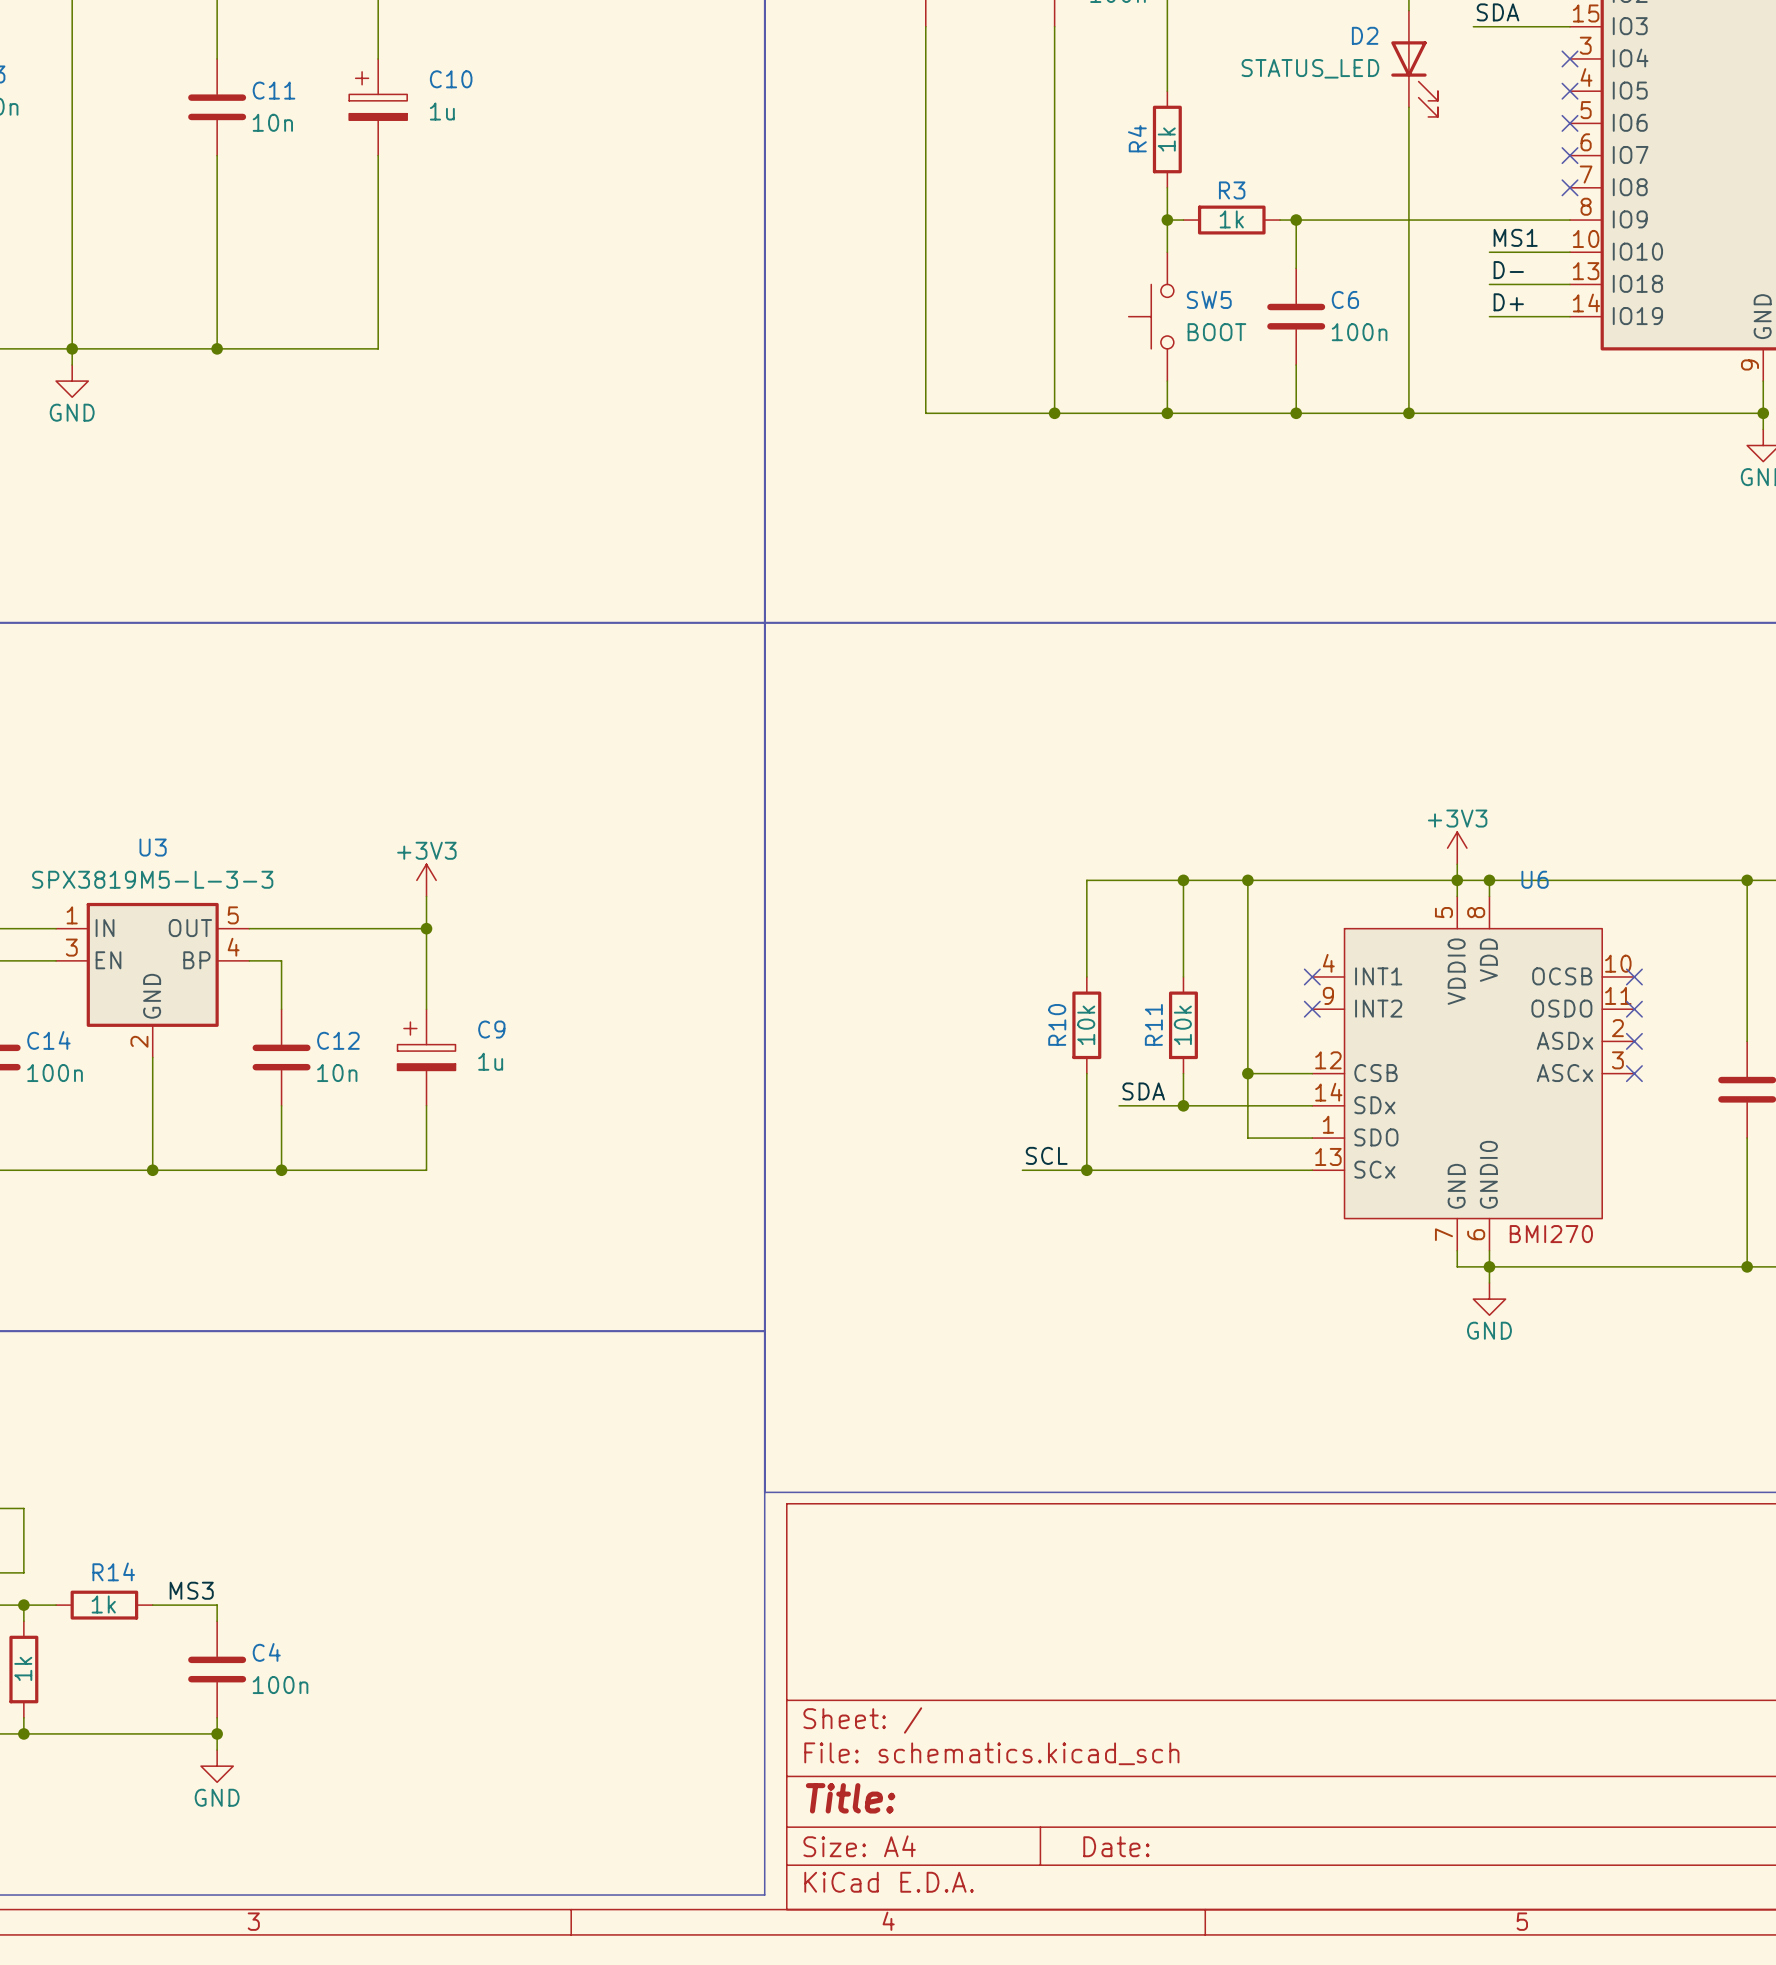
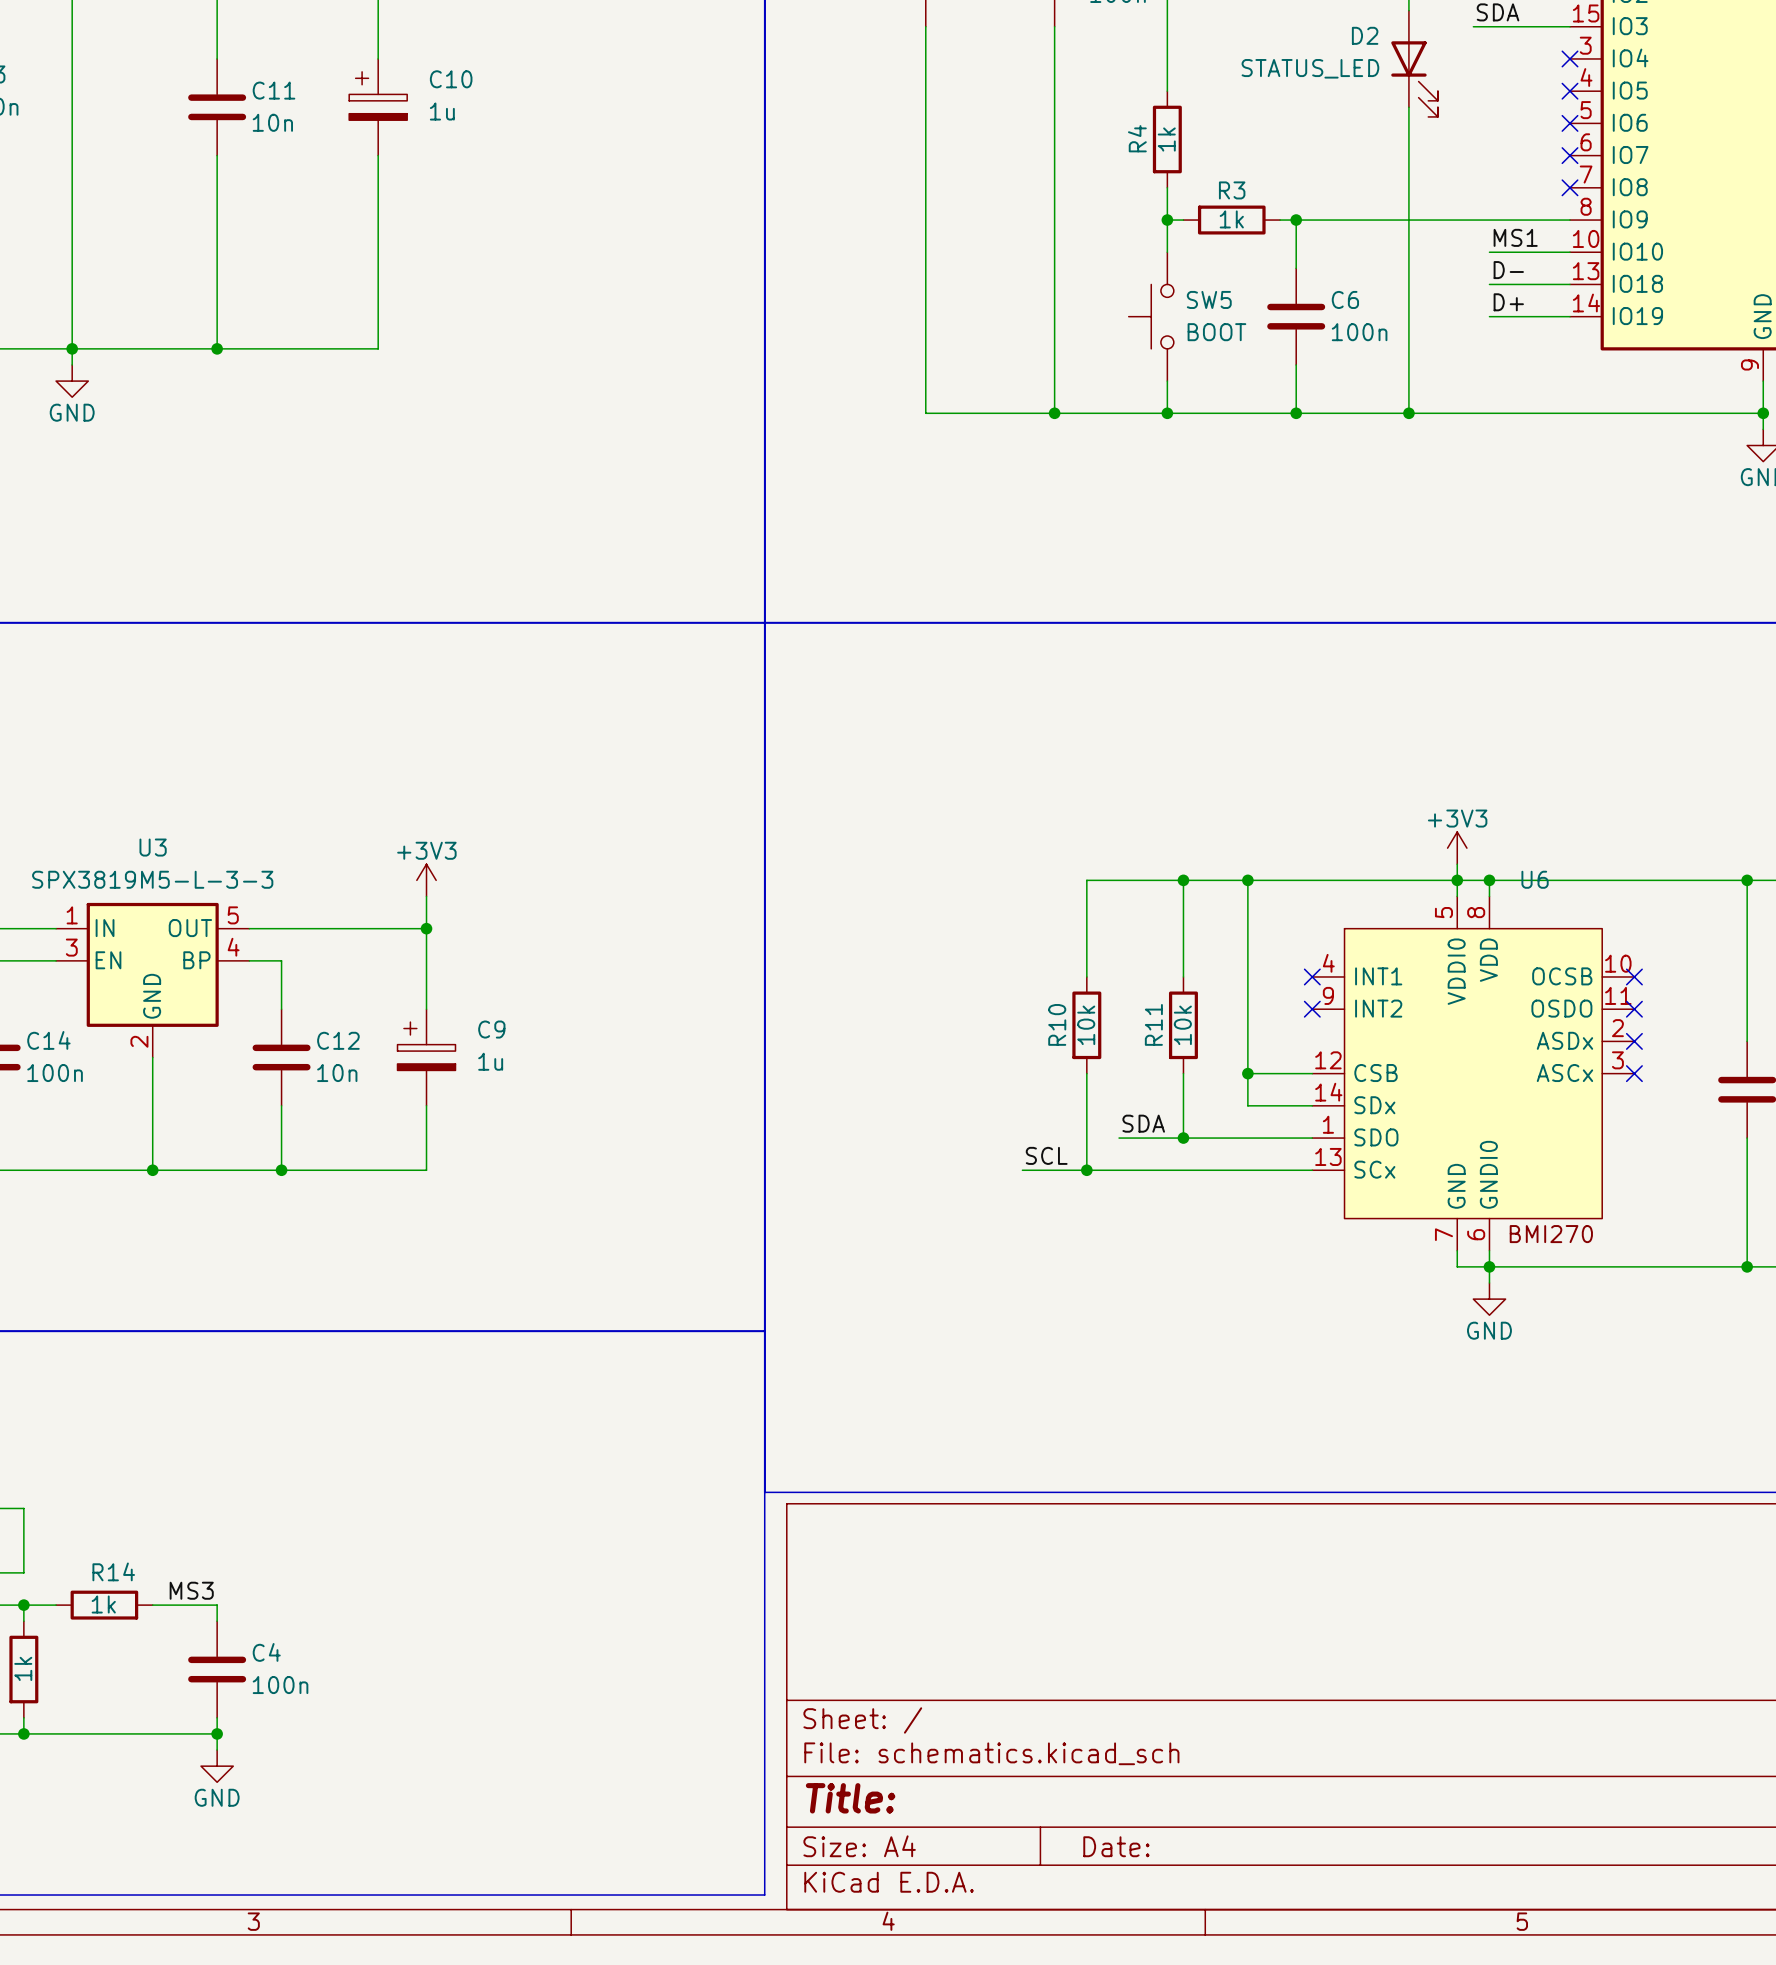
label position: SDA (1143, 1091) -> SDA (1143, 1123)
wire: (1119, 1105) (1247, 1105) (1247, 1138) -> (1119, 1138) (1247, 1138)
wire: none -> (1183, 1105) (1183, 1138)
junction position: (1183, 1105) -> (1183, 1138)

